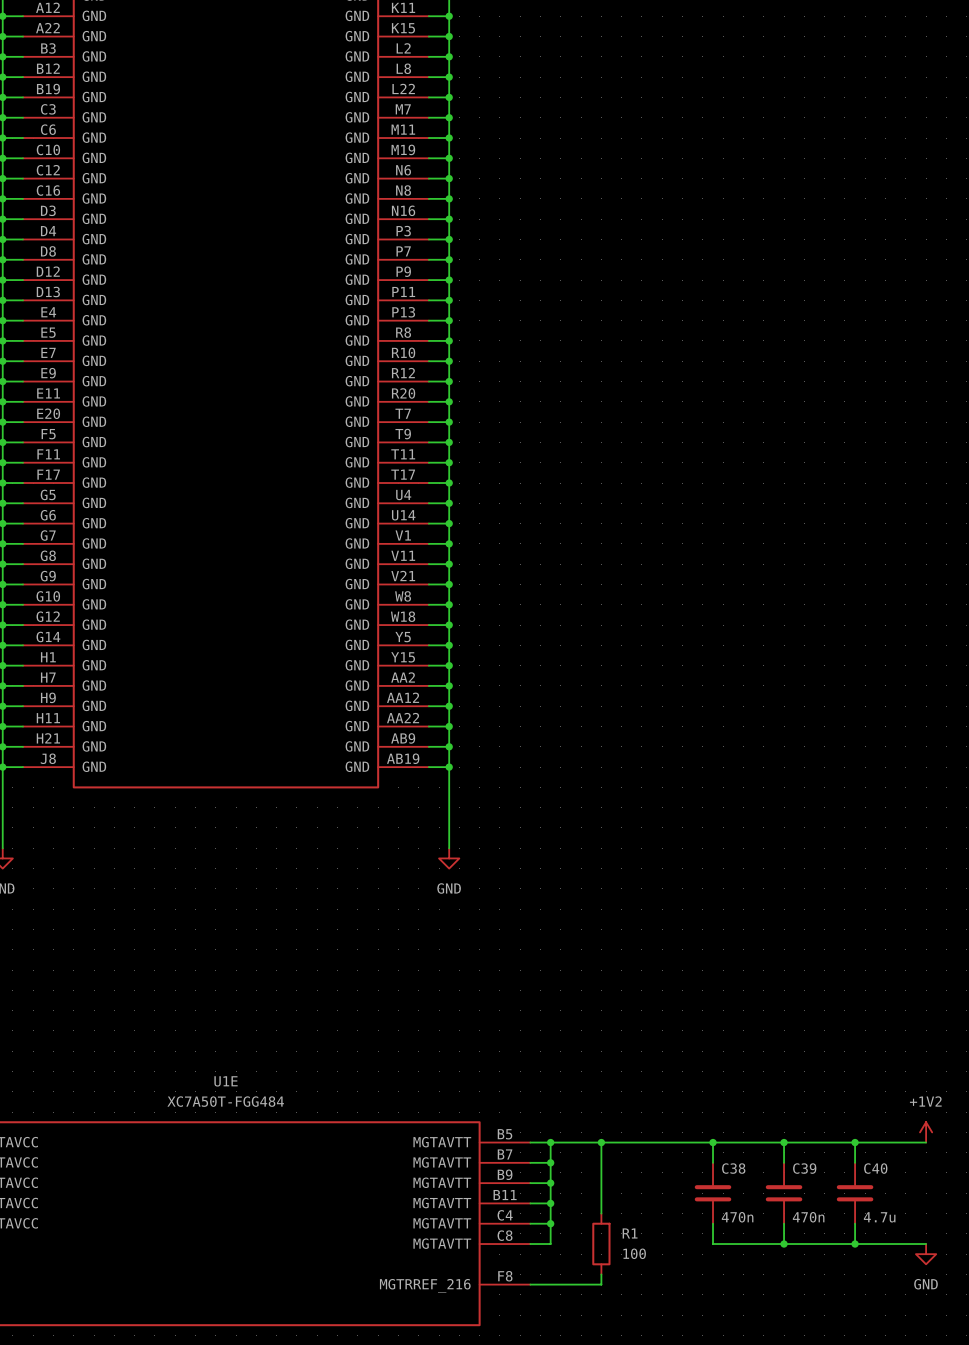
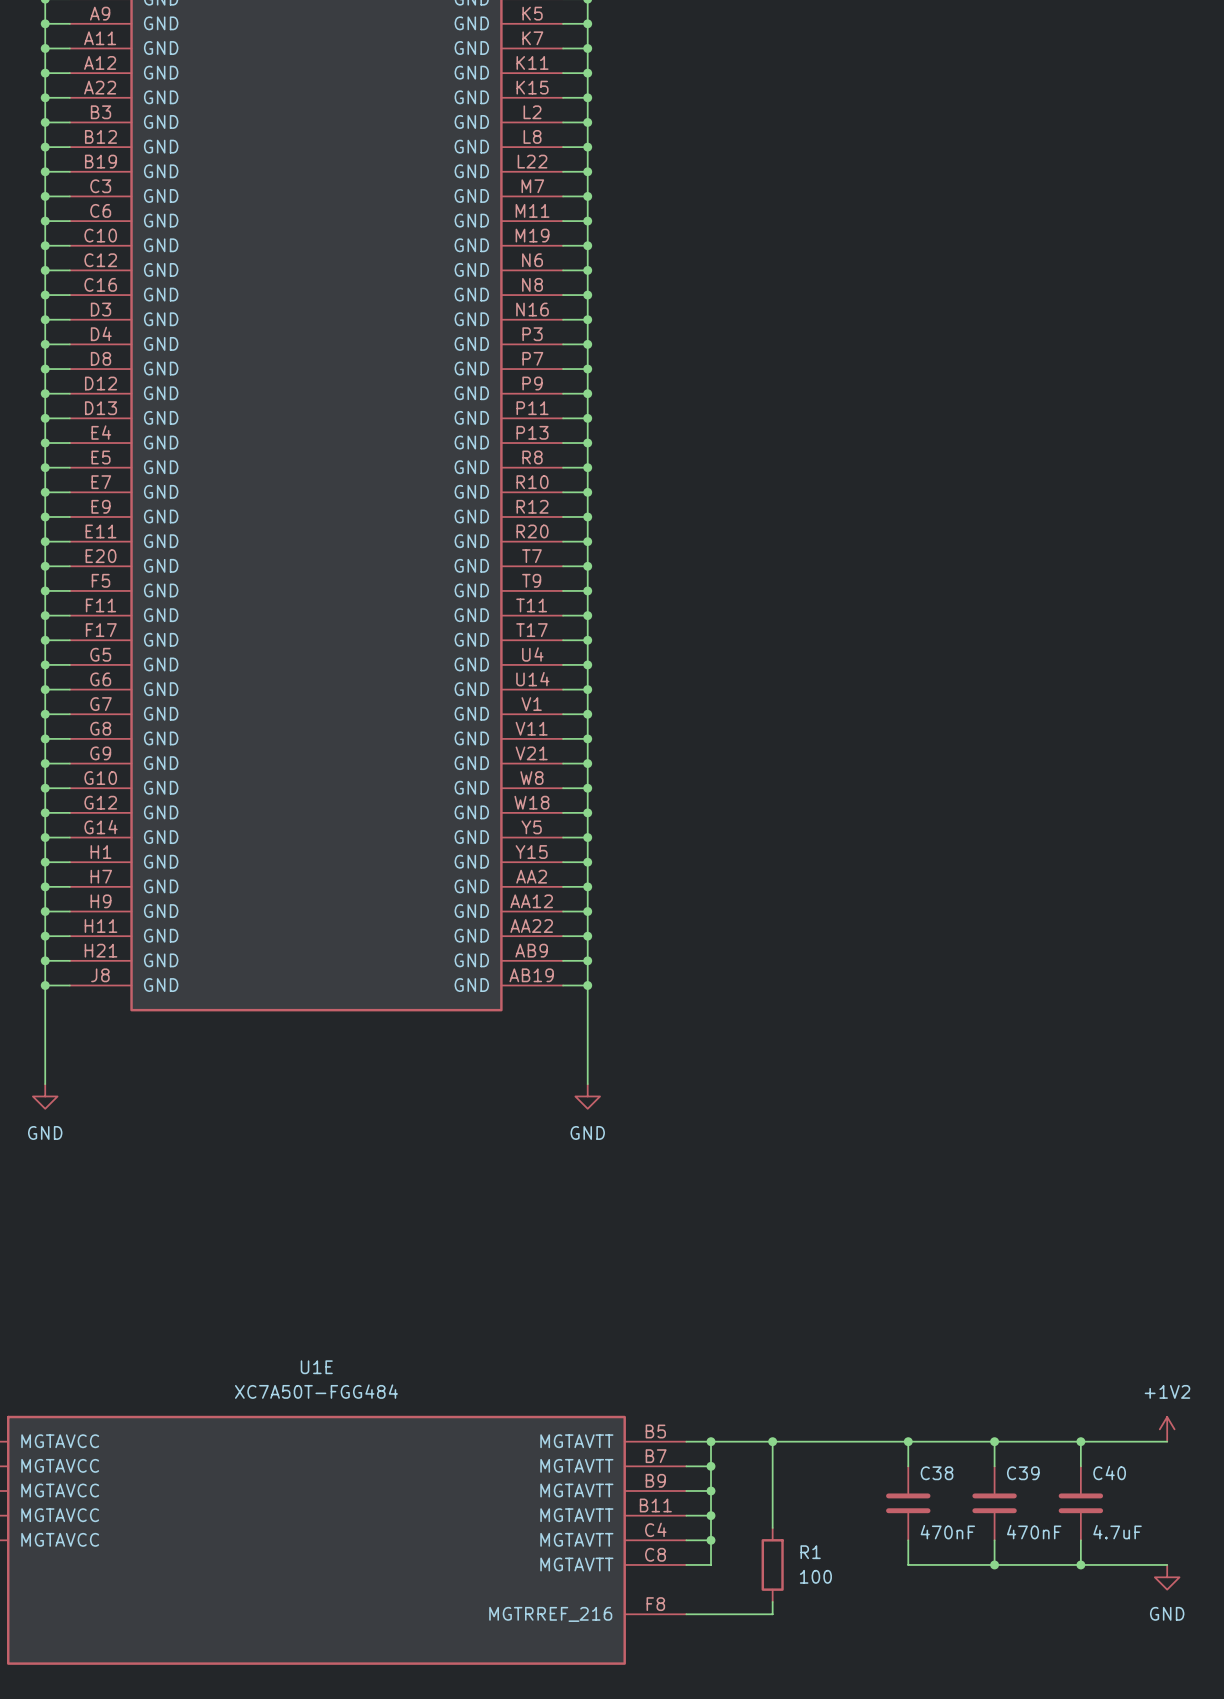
C38 value: 470n (737, 1217) -> 470nF (947, 1532)
C39 value: 470n (808, 1217) -> 470nF (1034, 1532)
C40 value: 4.7u (879, 1217) -> 4.7uF (1117, 1532)

